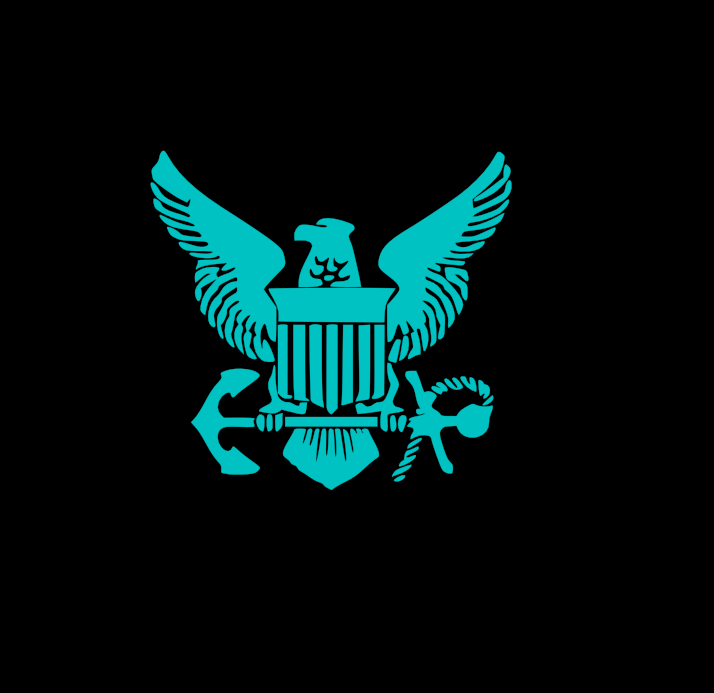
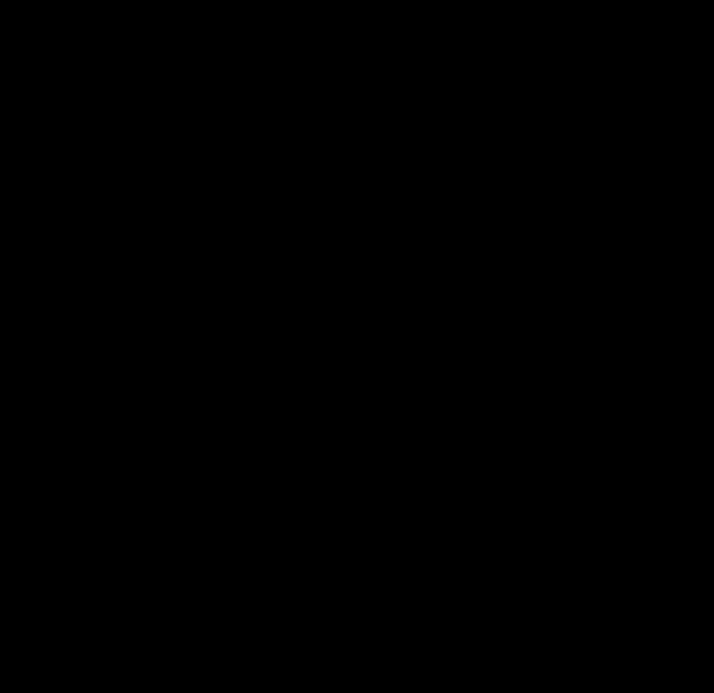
drawing: [150, 150, 512, 491] -> none

